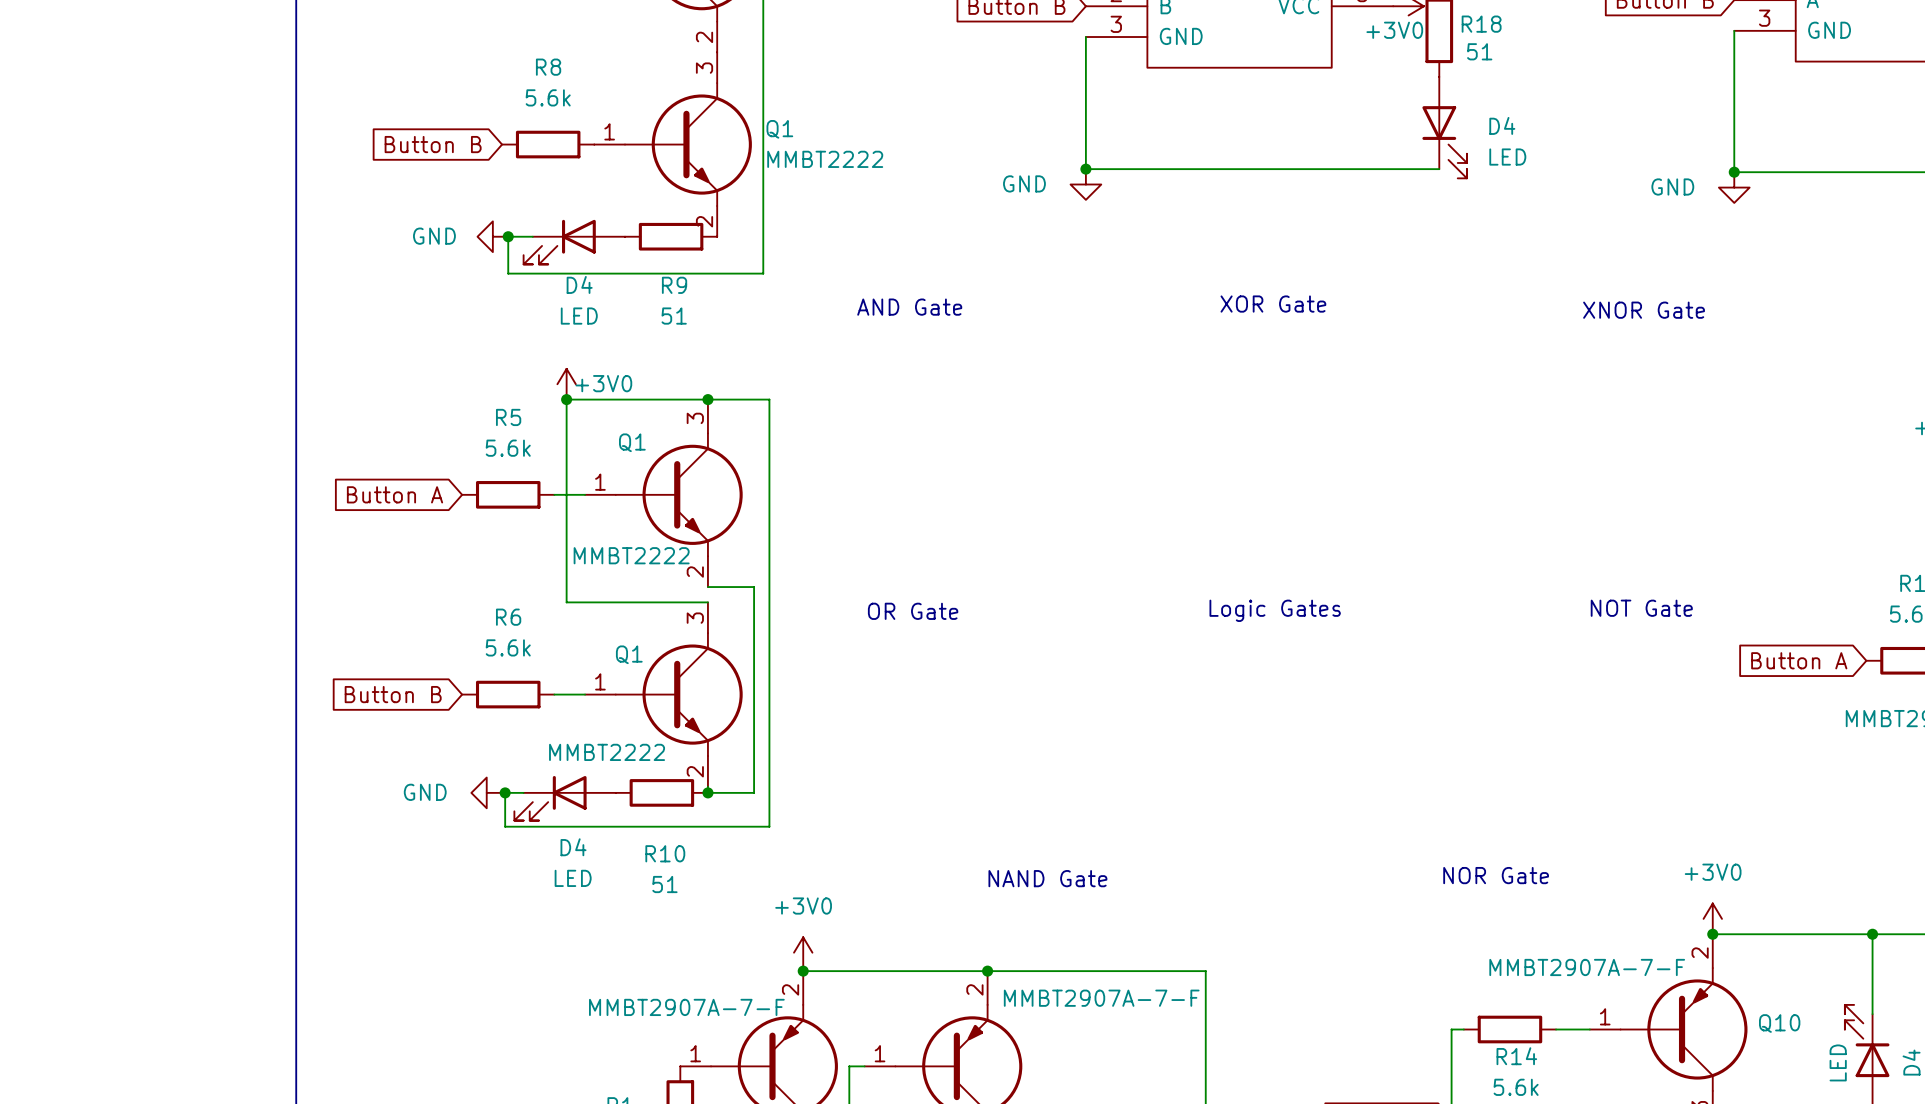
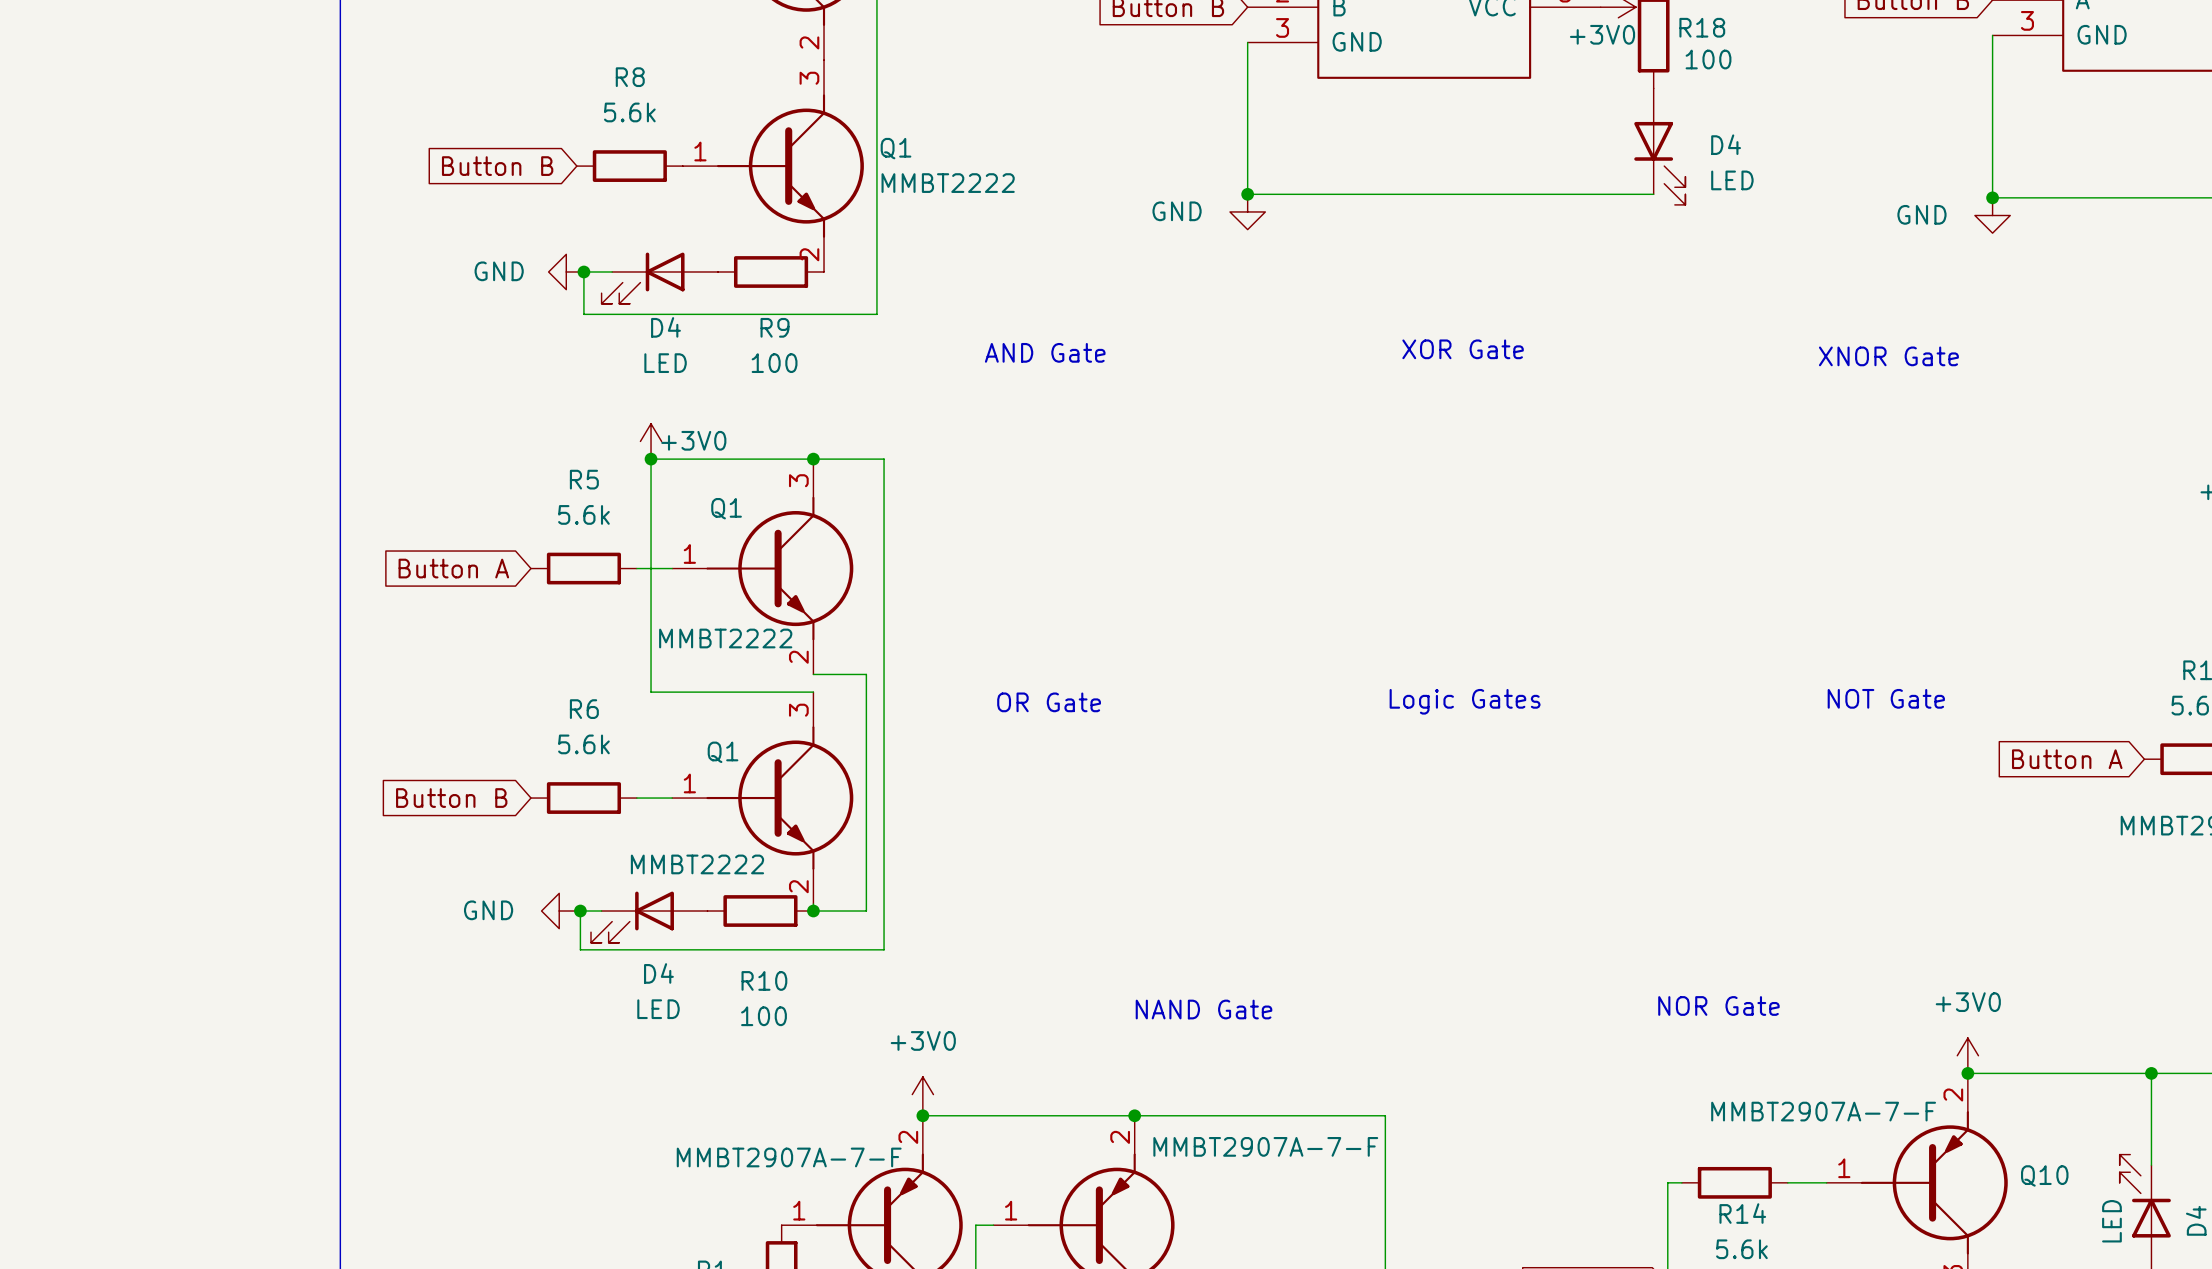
R18 value: 51 (1479, 51) -> 100 (1708, 59)
R9 value: 51 (674, 316) -> 100 (774, 363)
R10 value: 51 (664, 884) -> 100 (763, 1016)

